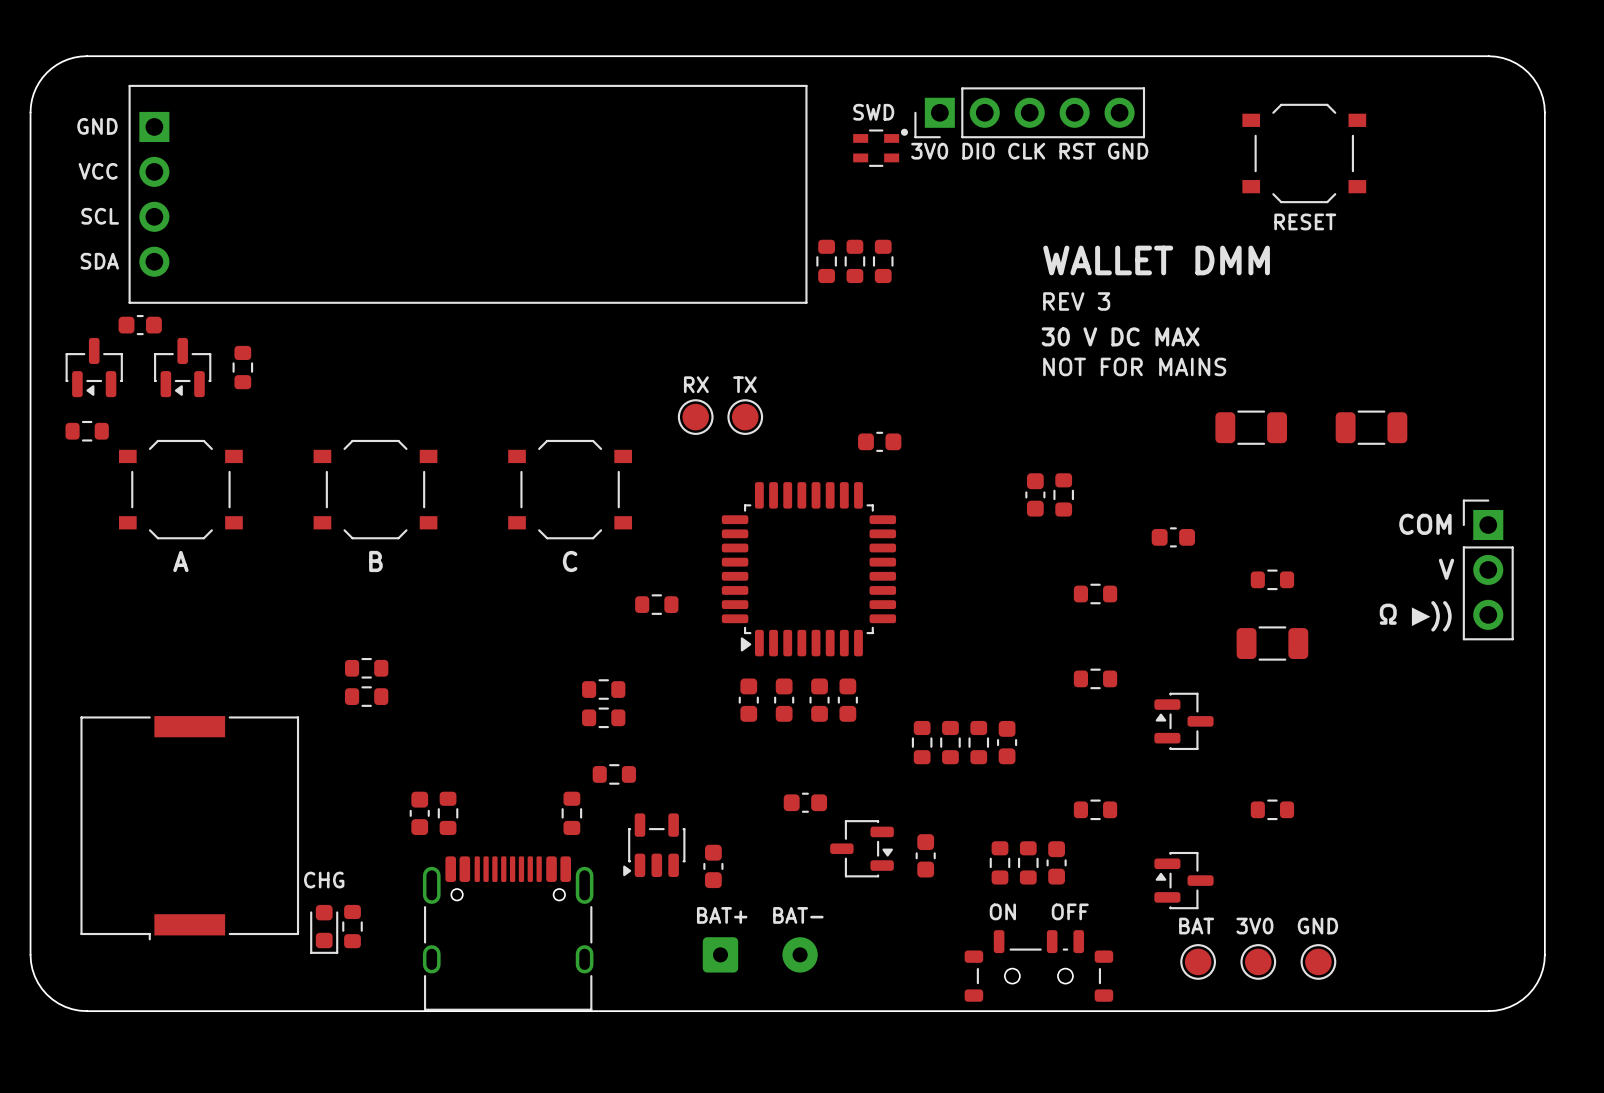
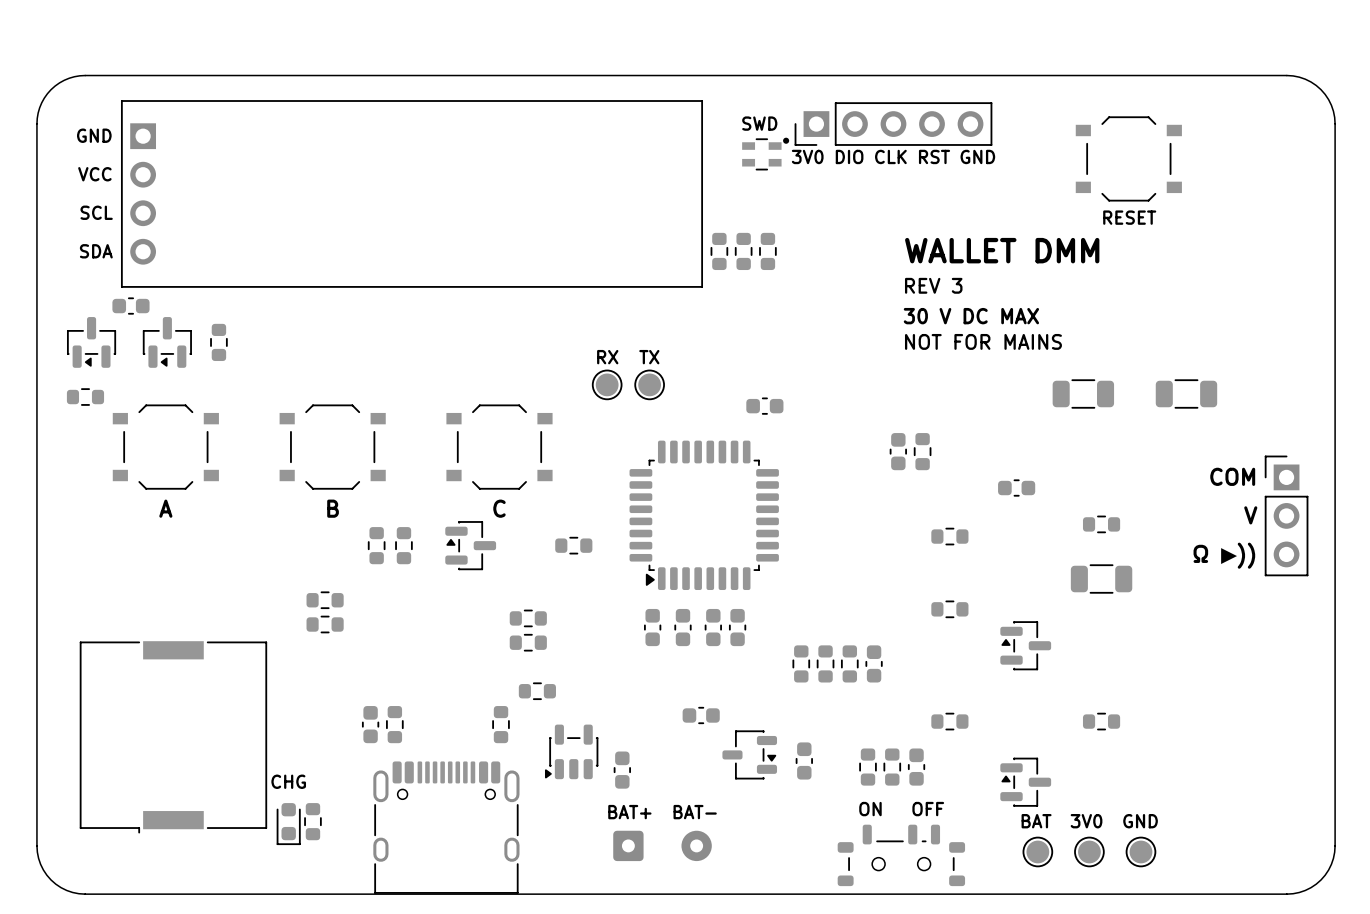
part: none -> (376, 545)
part: none -> (403, 545)
part: none -> (470, 545)

